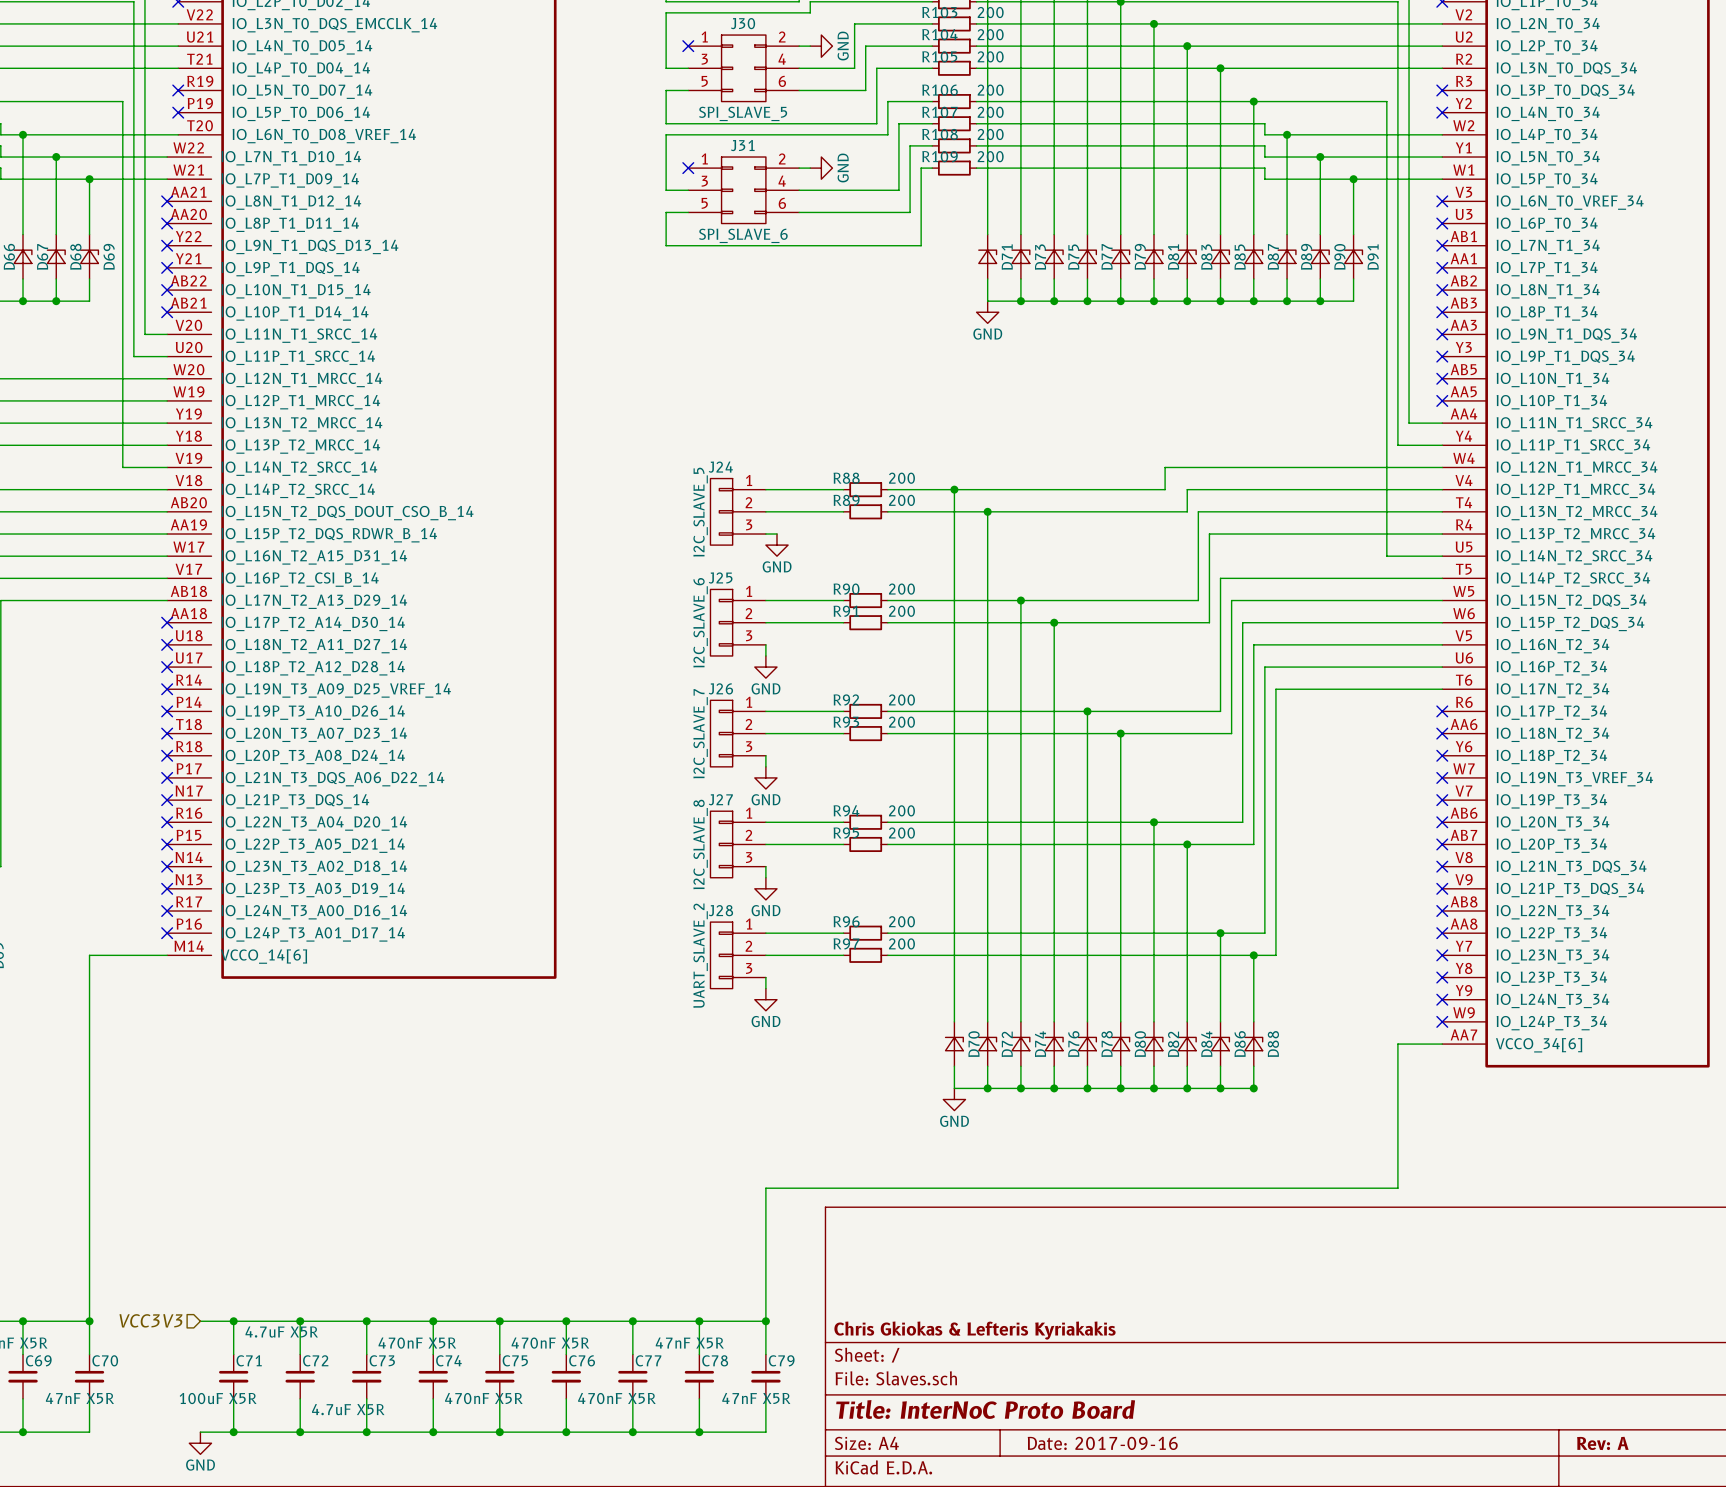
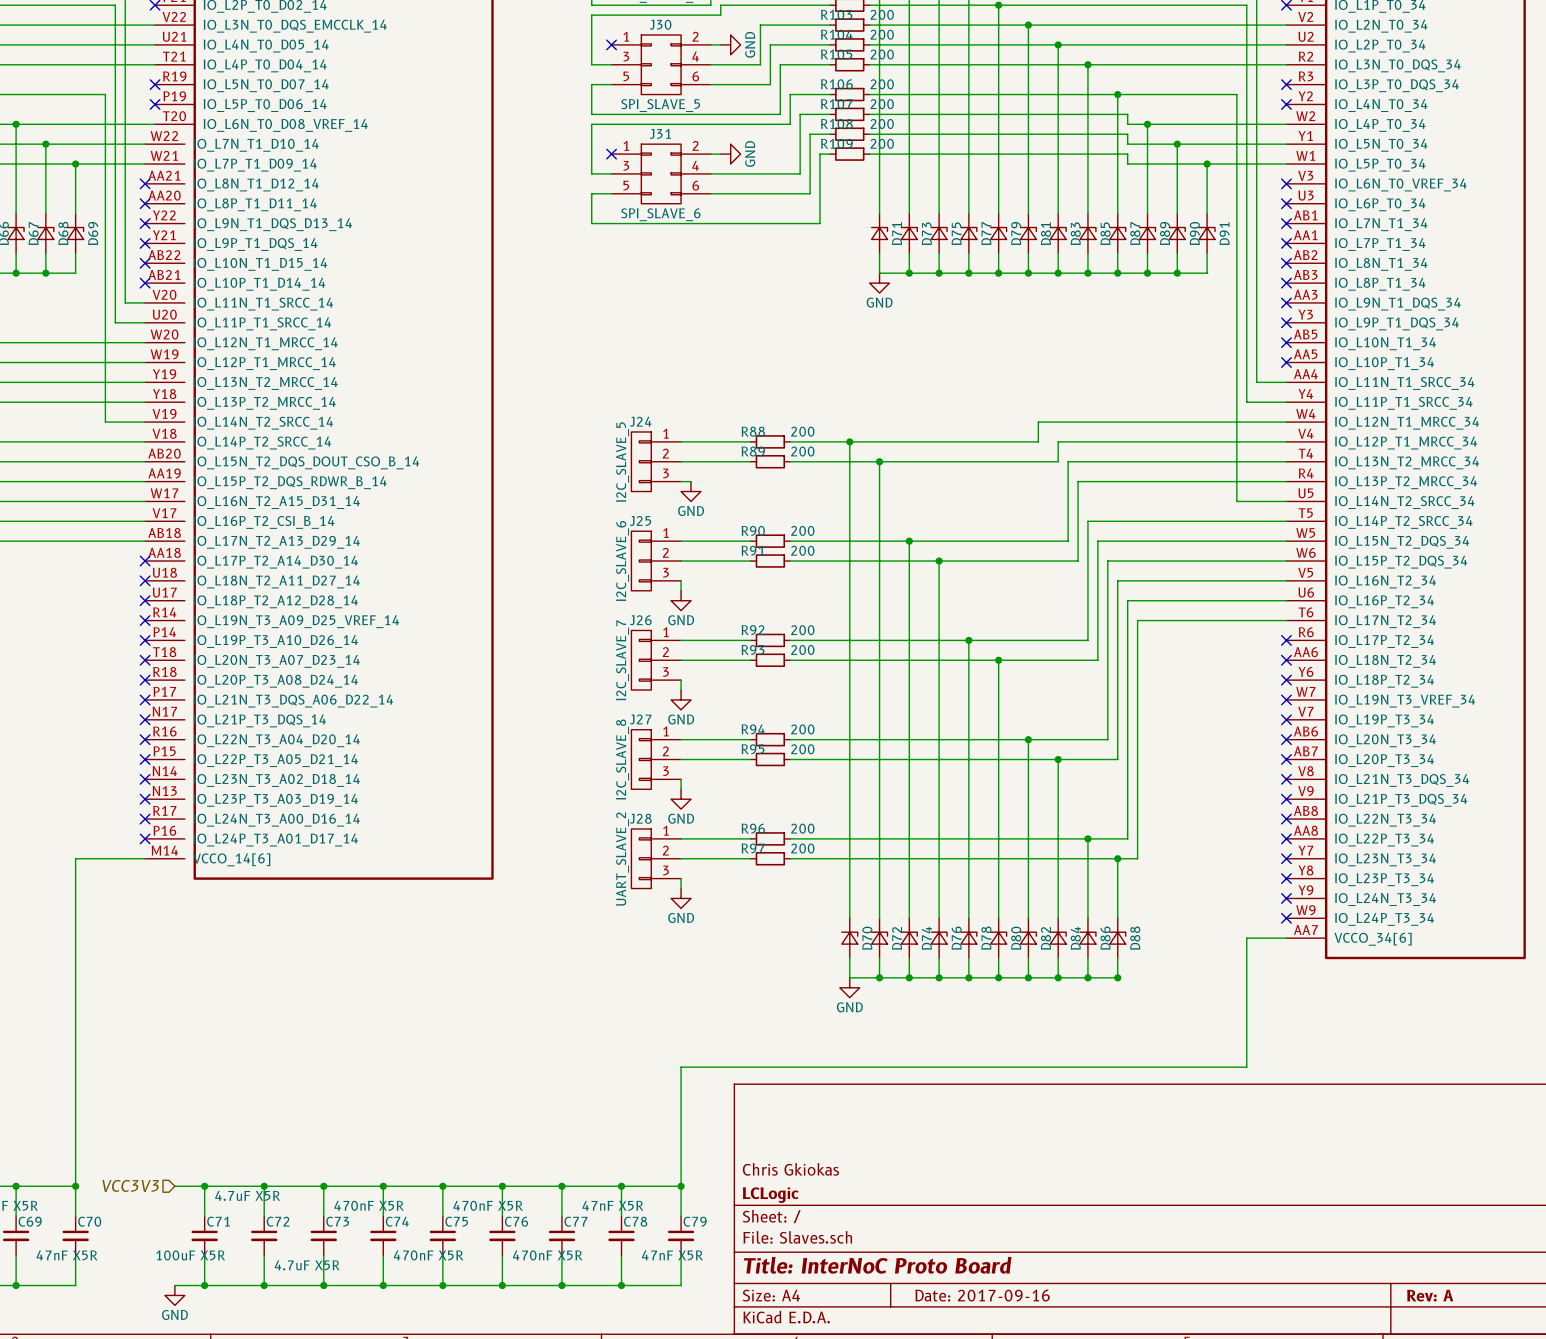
title block: none -> Chris Gkiokas (790, 1169)
title block: Chris Gkiokas & Lefteris Kyriakakis (974, 1330) -> LCLogic (770, 1195)

